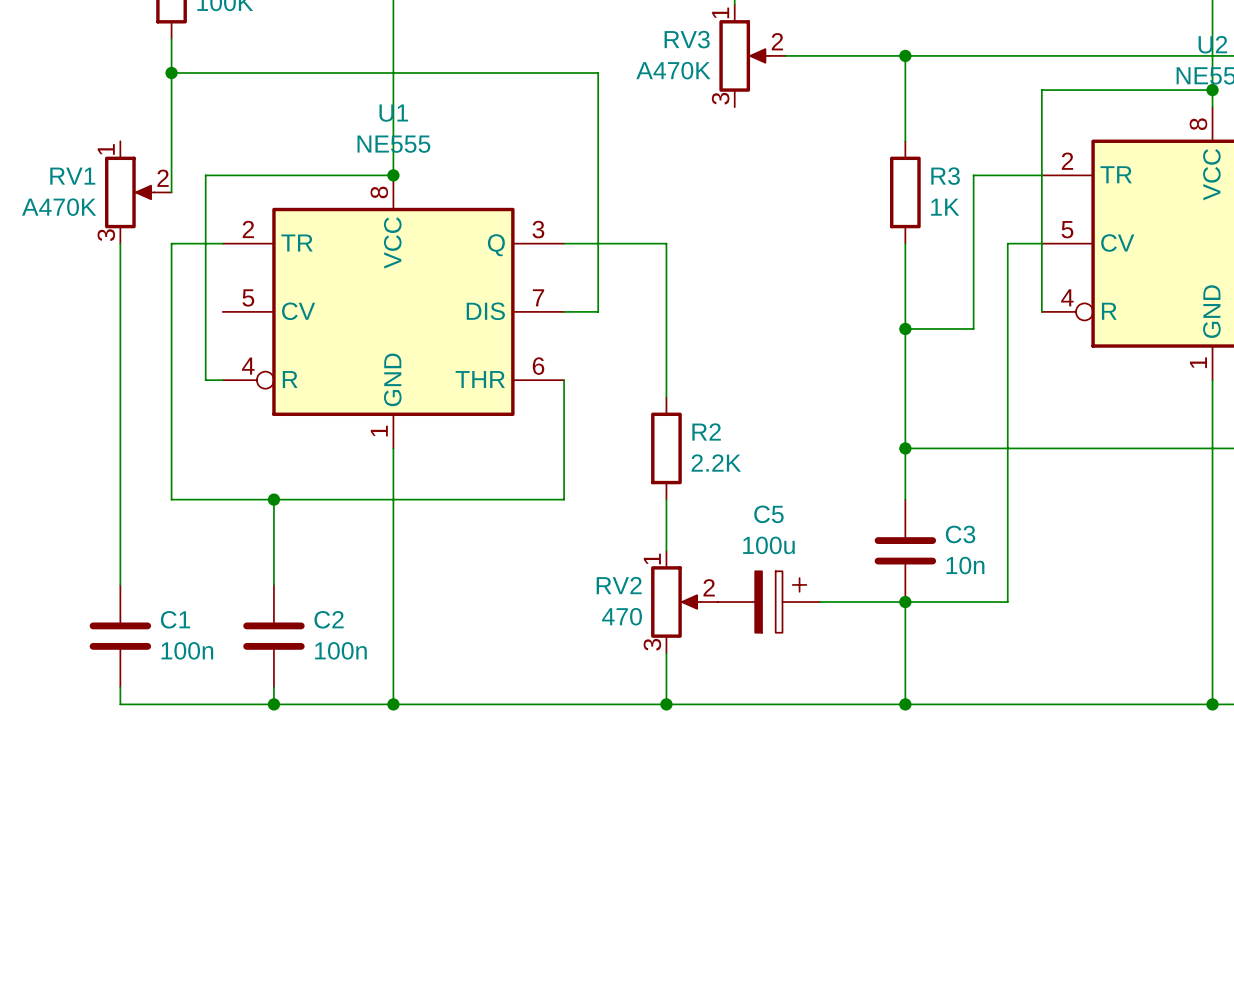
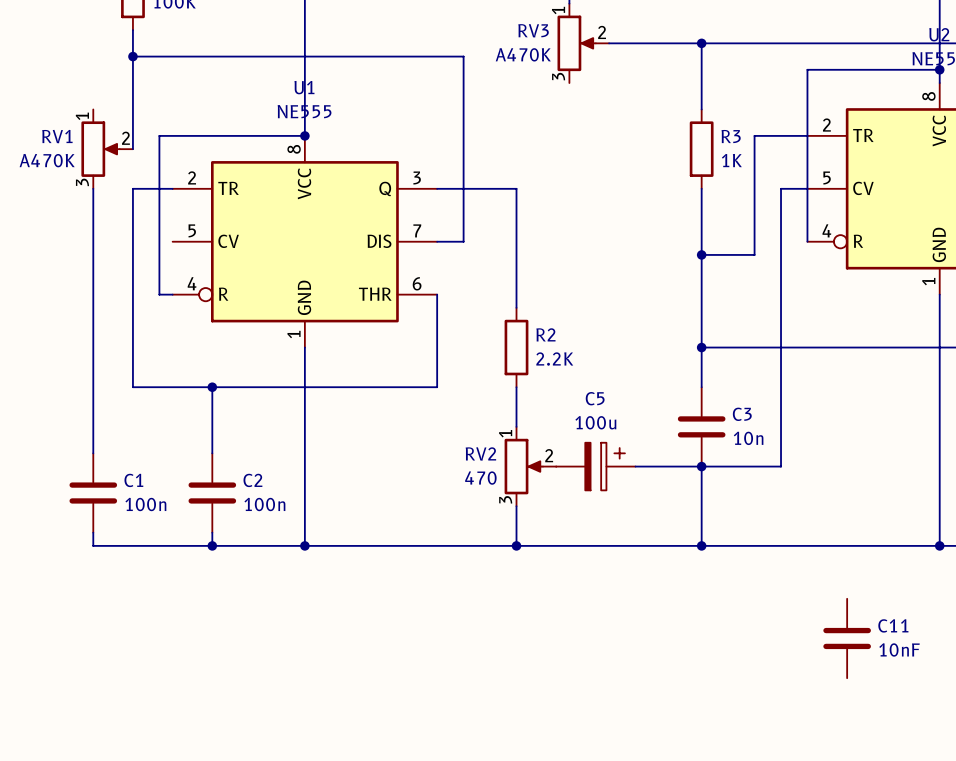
C11: none -> 10nF (847, 638)

